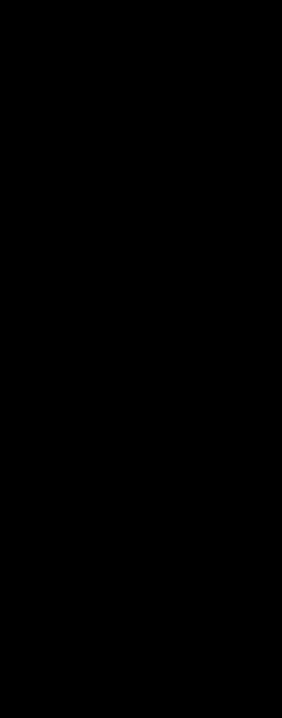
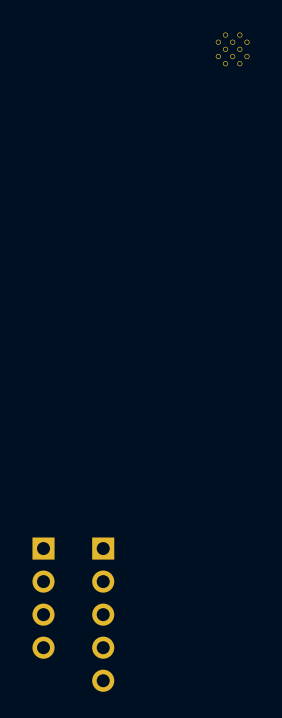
part: none -> (232, 49)
part: none -> (43, 598)
part: none -> (103, 614)

